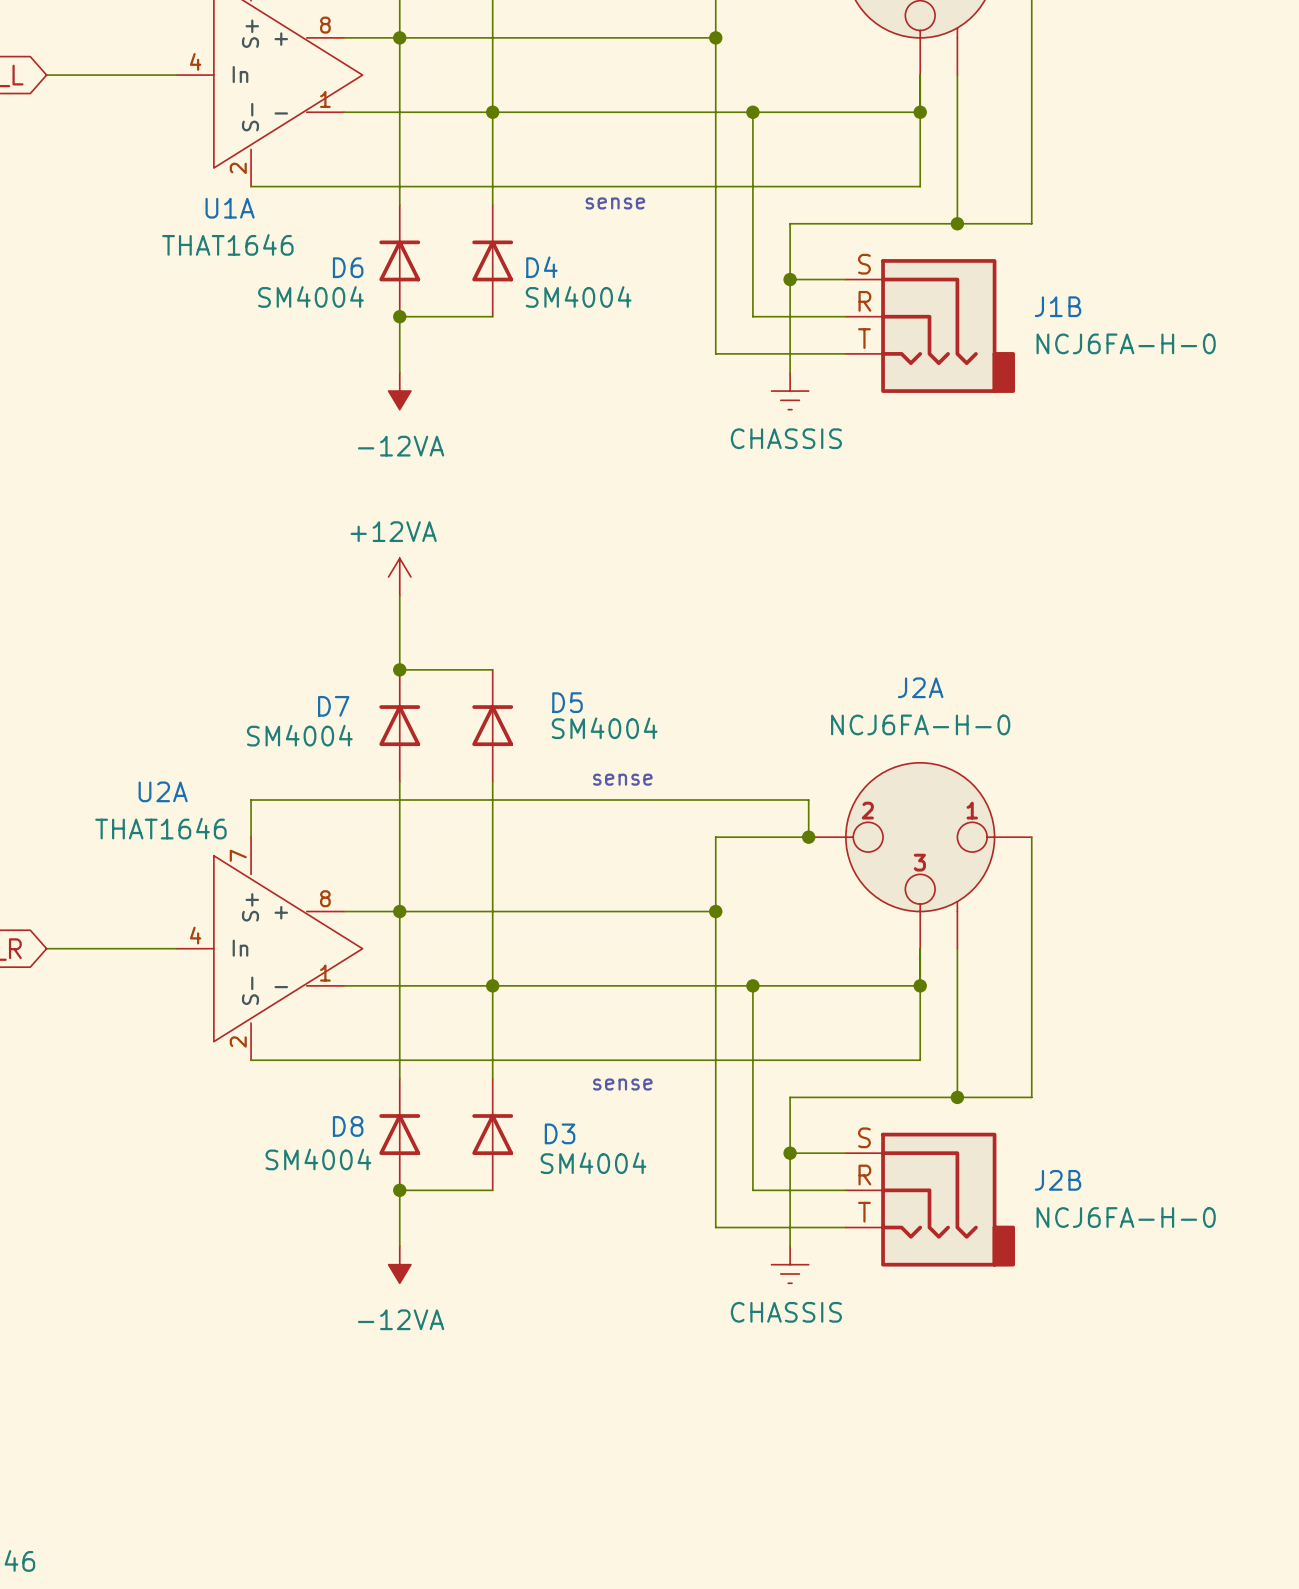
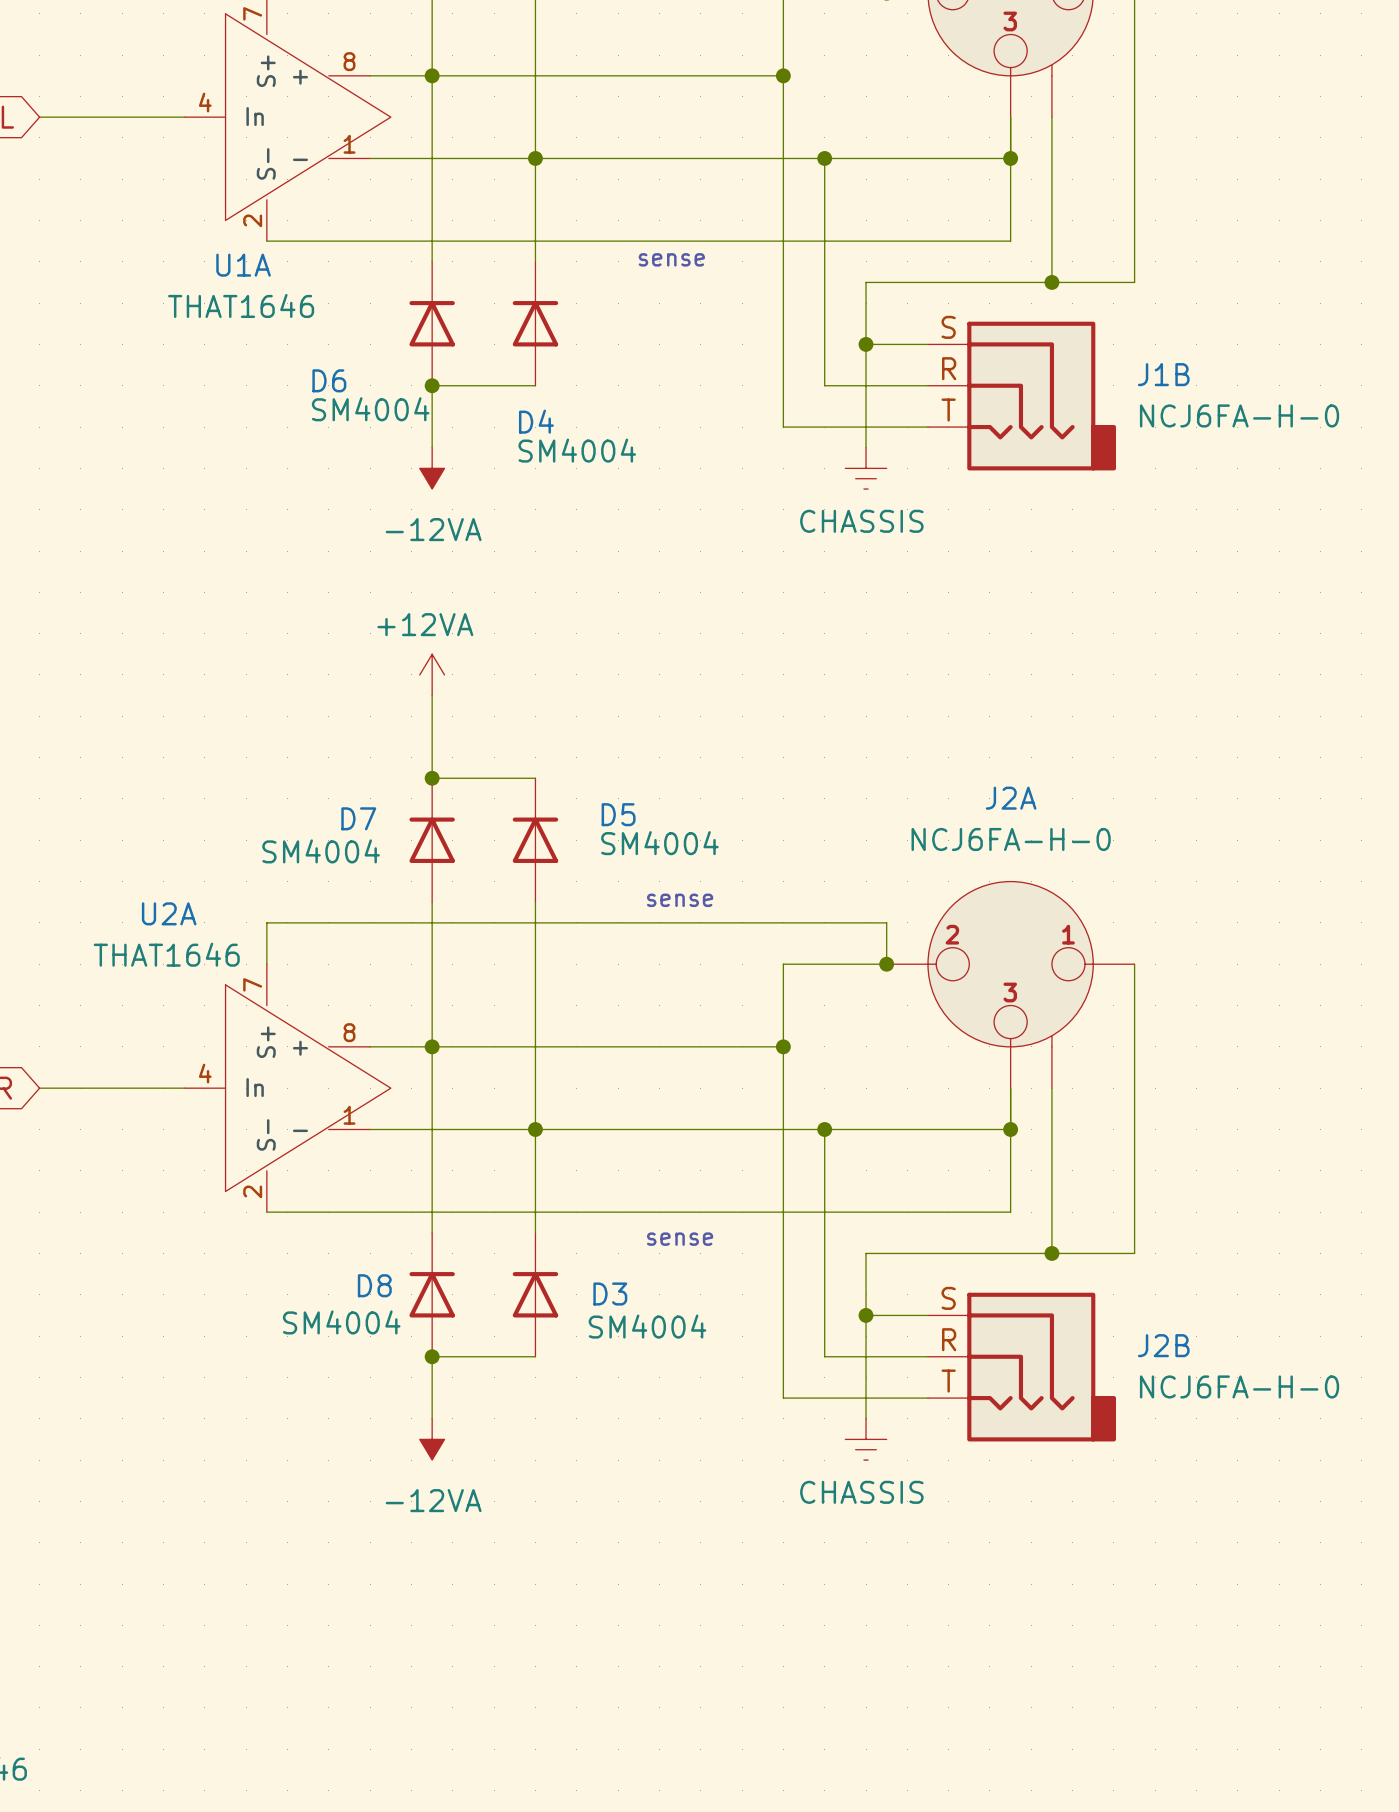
D6 name position: D6 (348, 267) -> D6 (329, 380)
D4 name position: D4 (541, 267) -> D4 (536, 421)
D6 value position: SM4004 (310, 296) -> SM4004 (370, 409)
D4 value position: SM4004 (578, 296) -> SM4004 (577, 450)

